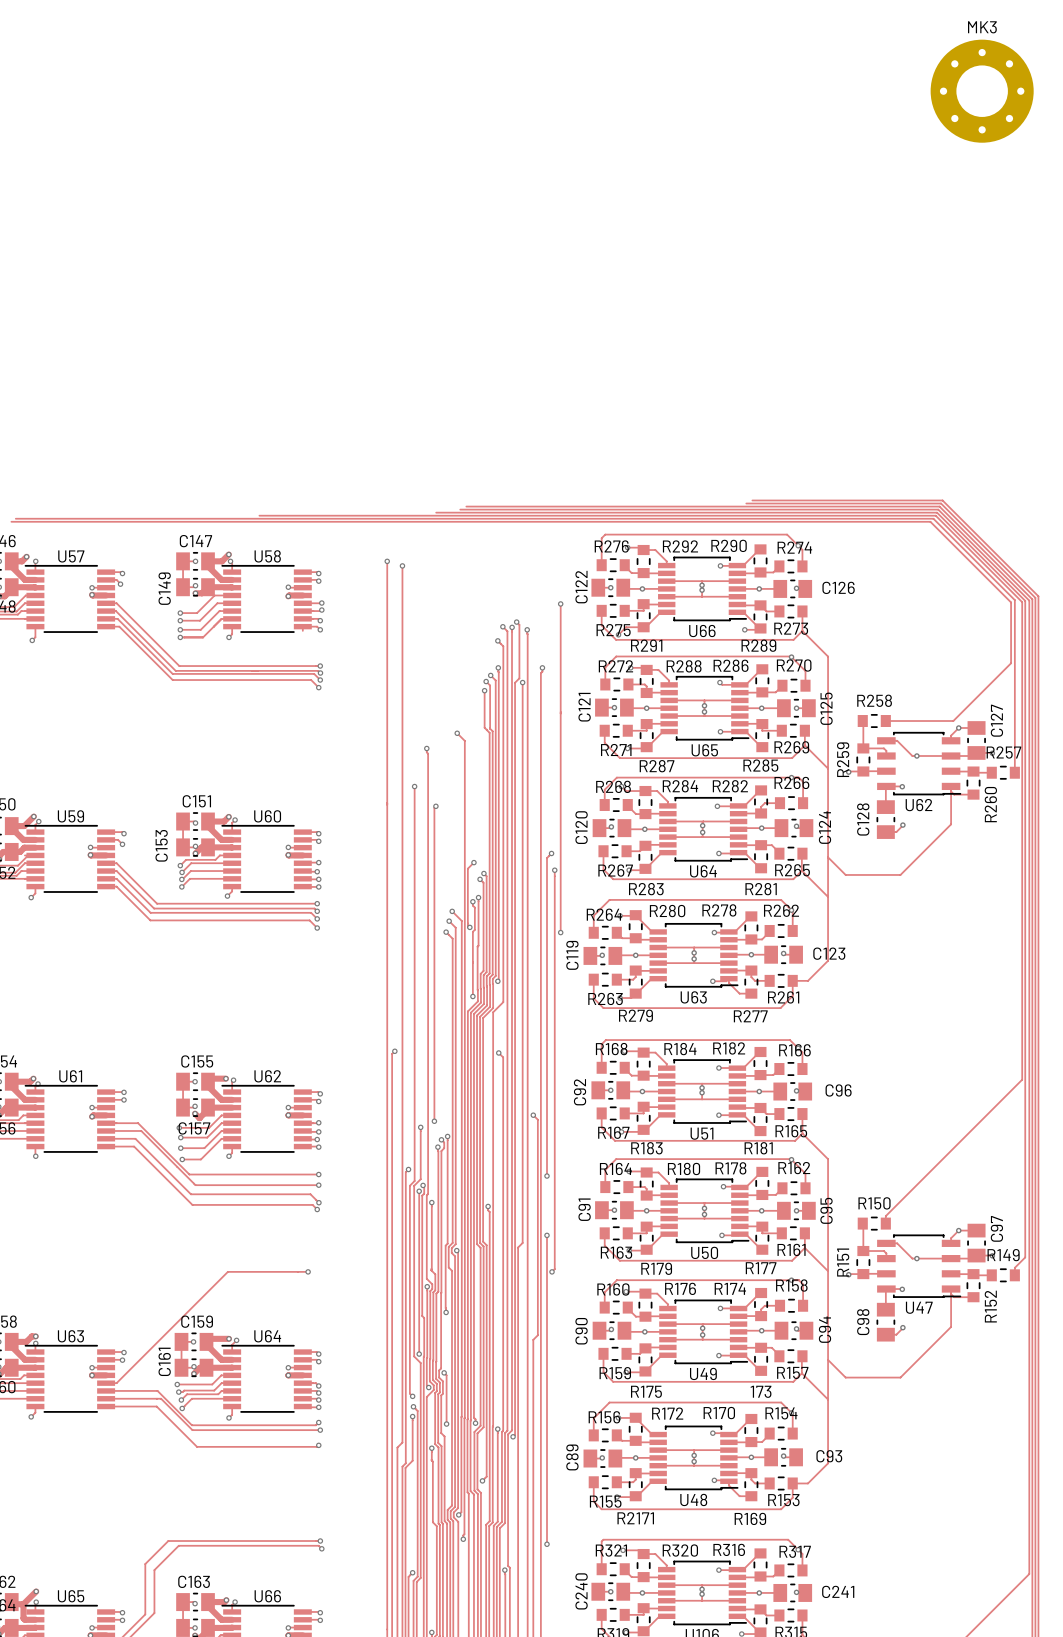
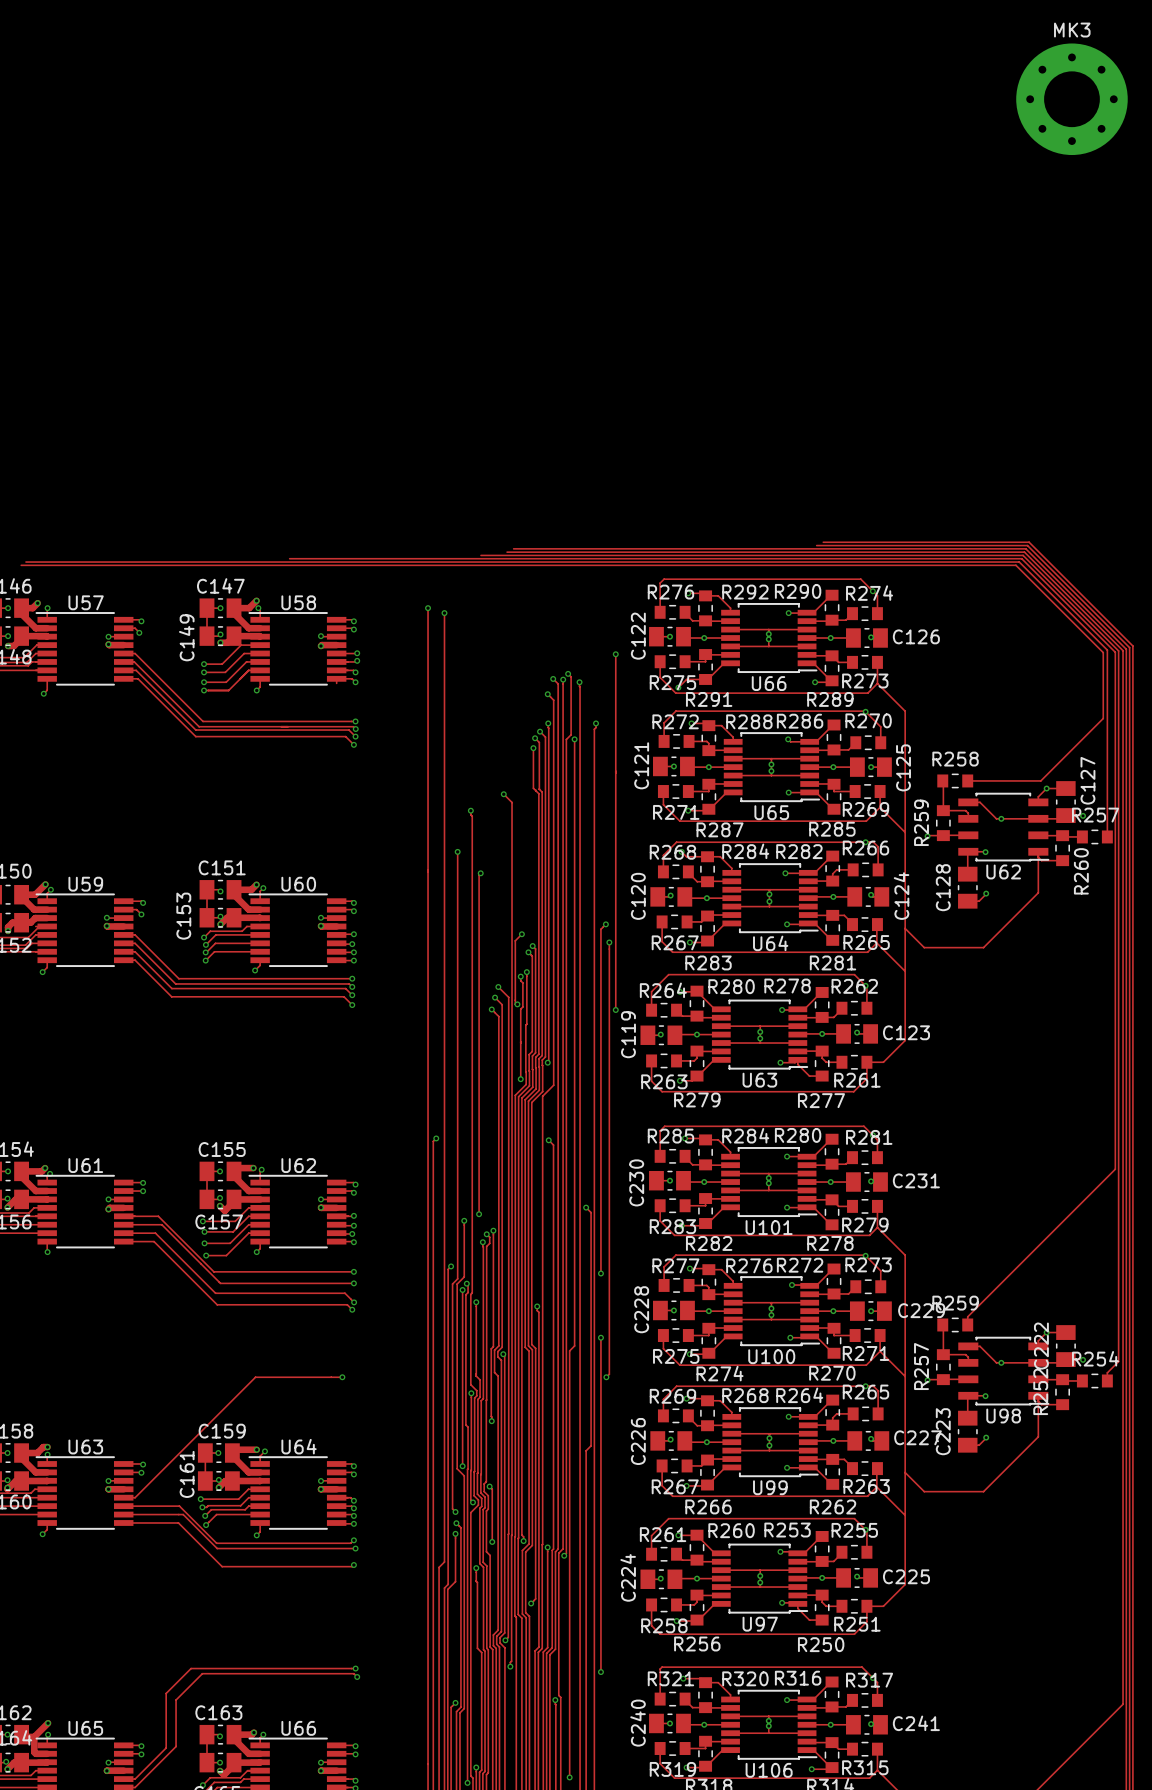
R182 name: R182 (729, 1048) -> R280 (798, 1135)
R168 name: R168 (611, 1049) -> R285 (670, 1136)
R184 name: R184 (680, 1049) -> R284 (745, 1135)
R166 name: R166 (794, 1050) -> R281 (869, 1137)
C96 name: C96 (838, 1090) -> C231 (916, 1180)
C92 name: C92 (580, 1092) -> C230 (636, 1182)
R165 name: R165 (791, 1131) -> R279 (865, 1225)
R167 name: R167 (613, 1132) -> R283 (672, 1226)
U51 name: U51 (702, 1133) -> U101 (769, 1227)
R183 name: R183 (646, 1148) -> R282 (709, 1243)
R181 name: R181 (758, 1148) -> R278 (830, 1243)
R164 name: R164 (615, 1168) -> R277 (675, 1265)
R180 name: R180 (684, 1168) -> R276 (749, 1265)
R178 name: R178 (730, 1168) -> R272 (800, 1265)
R162 name: R162 (794, 1168) -> R273 (868, 1264)
R150 name: R150 (874, 1203) -> R259 (955, 1303)
C91 name: C91 (584, 1209) -> C228 (641, 1309)
C95 name: C95 (826, 1210) -> C229 (921, 1310)
C97 name: C97 (996, 1228) -> C222 (1041, 1346)
R161 name: R161 (791, 1249) -> R271 (865, 1353)
R163 name: R163 (616, 1252) -> R275 (676, 1356)
U50 name: U50 (704, 1252) -> U100 (771, 1356)
R149 name: R149 (1003, 1255) -> R254 (1095, 1358)
R151 name: R151 (843, 1262) -> R257 (921, 1366)
R179 name: R179 (656, 1268) -> R274 (720, 1373)
R177 name: R177 (761, 1268) -> R270 (832, 1373)
R158 name: R158 (791, 1285) -> R265 (865, 1392)
R176 name: R176 (680, 1288) -> R268 (745, 1395)
R174 name: R174 (730, 1288) -> R264 (799, 1395)
R160 name: R160 (613, 1289) -> R269 (672, 1396)
R152 name: R152 (990, 1306) -> R252 (1040, 1391)
U47 name: U47 (919, 1307) -> U98 (1003, 1415)
C98 name: C98 (863, 1322) -> C223 (943, 1431)
C94 name: C94 (825, 1329) -> C227 (917, 1437)
C90 name: C90 (581, 1331) -> C226 (638, 1441)
R157 name: R157 (792, 1372) -> R263 (866, 1486)
R159 name: R159 (615, 1373) -> R267 (675, 1486)
U49 name: U49 (703, 1373) -> U99 (770, 1487)
R175 name: R175 (646, 1391) -> R266 (708, 1506)
173 name: 173 (761, 1391) -> R262 (833, 1506)
R172 name: R172 (667, 1413) -> R260 (731, 1530)
R170 name: R170 (719, 1413) -> R253 (787, 1530)
R154 name: R154 (781, 1413) -> R255 (854, 1530)
R156 name: R156 (604, 1417) -> R261 (663, 1534)
C93 name: C93 (829, 1456) -> C225 (906, 1576)
C89 name: C89 (572, 1457) -> C224 (628, 1577)
U48 name: U48 (693, 1499) -> U97 (760, 1624)
R153 name: R153 (783, 1500) -> R251 (857, 1624)
R155 name: R155 (605, 1501) -> R258 (664, 1625)
R2171 name: R2171 (635, 1518) -> R256 (697, 1644)
R169 name: R169 (750, 1518) -> R250 (821, 1644)

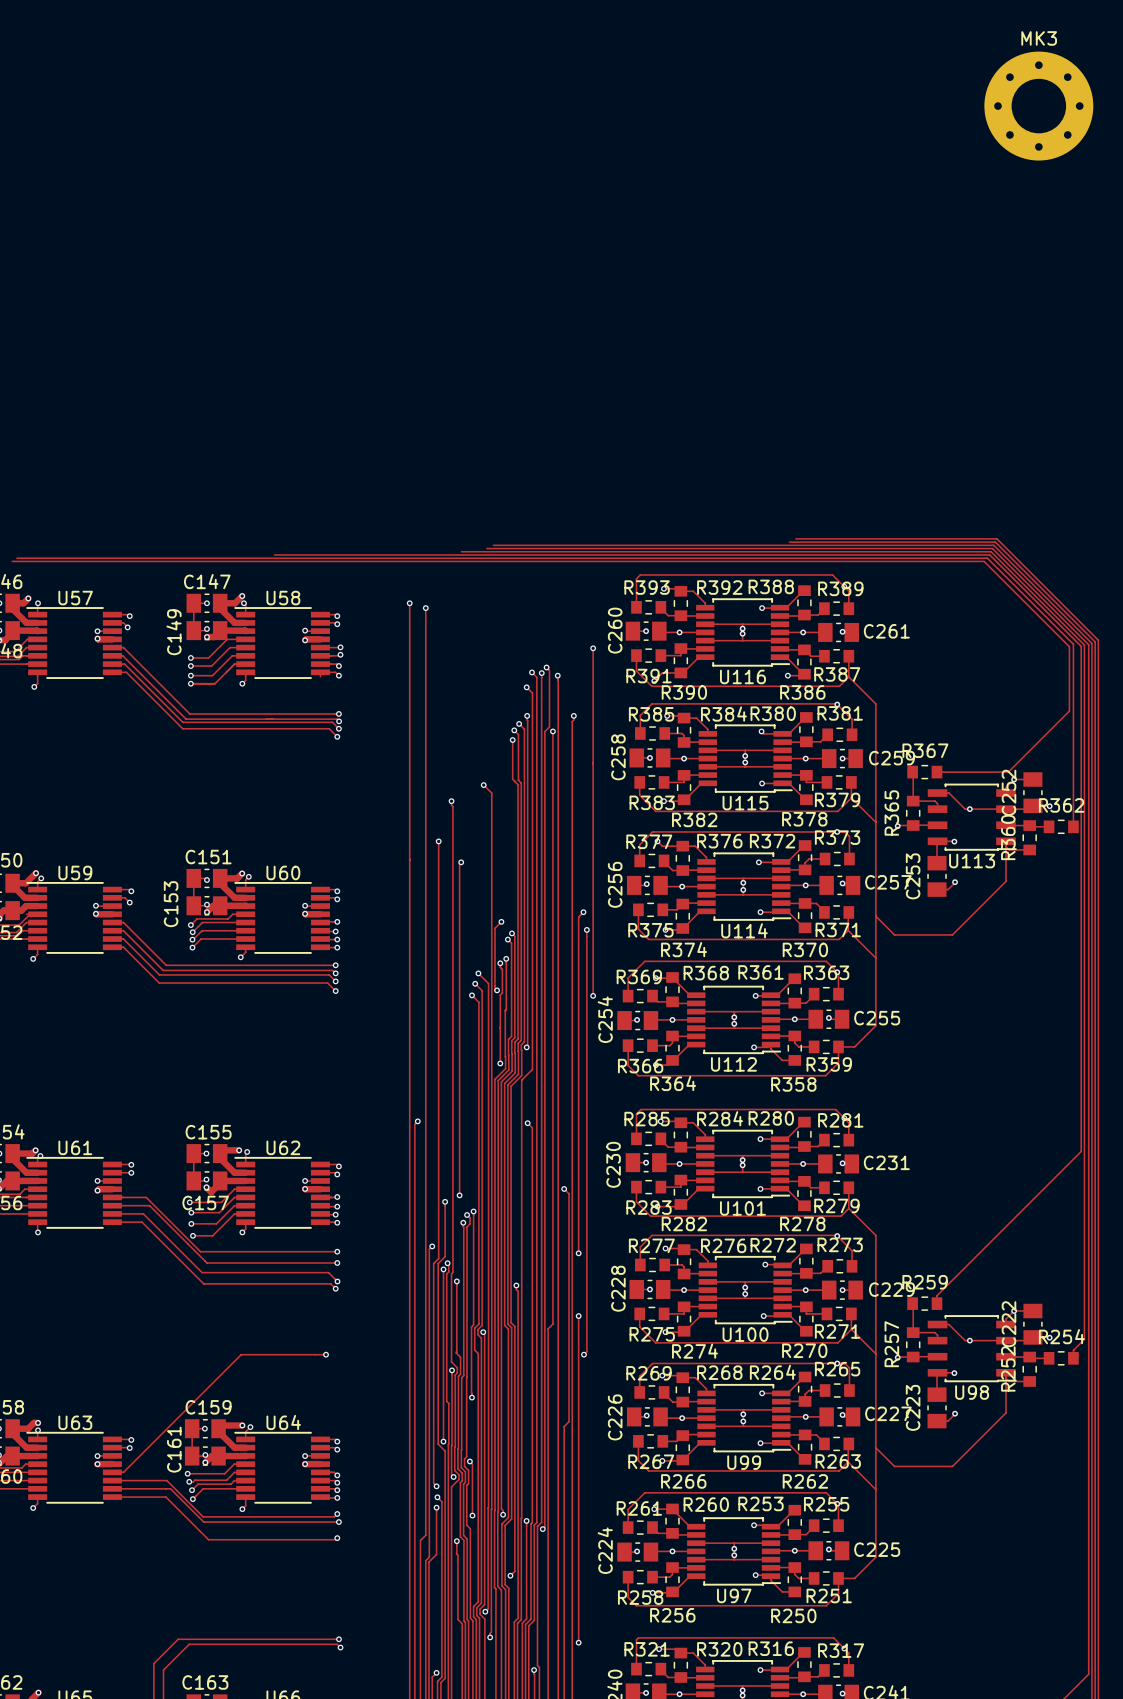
R290 name: R290 (798, 591) -> R388 (771, 586)
R276 name: R276 (670, 592) -> R393 (647, 587)
R292 name: R292 (745, 592) -> R392 (719, 587)
R274 name: R274 (869, 593) -> R389 (840, 588)
C122 name: C122 (638, 636) -> C260 (615, 630)
C126 name: C126 (916, 636) -> C261 (886, 631)
R273 name: R273 (865, 681) -> R387 (837, 674)
R275 name: R275 (672, 682) -> R391 (648, 676)
U66 name: U66 (769, 683) -> U116 (742, 676)
R291 name: R291 (709, 699) -> R390 (684, 692)
R289 name: R289 (830, 699) -> R386 (802, 692)
R270 name: R270 (868, 720) -> R381 (840, 713)
R272 name: R272 (675, 721) -> R385 (651, 714)
R288 name: R288 (749, 721) -> R384 (723, 714)
R286 name: R286 (800, 721) -> R380 (773, 713)
R258 name: R258 (955, 759) -> R367 (925, 750)
C121 name: C121 (641, 765) -> C258 (618, 757)
C125 name: C125 (903, 767) -> C259 (891, 758)
C127 name: C127 (1087, 780) -> C252 (1009, 792)
R269 name: R269 (865, 809) -> R379 (837, 799)
R271 name: R271 (676, 812) -> R383 (652, 802)
U65 name: U65 (771, 812) -> U115 (745, 803)
R257 name: R257 (1095, 815) -> R362 (1061, 805)
R259 name: R259 (921, 822) -> R365 (891, 813)
R287 name: R287 (720, 829) -> R382 (694, 819)
R285 name: R285 (832, 829) -> R378 (804, 819)
R266 name: R266 (865, 848) -> R373 (837, 837)
R284 name: R284 (745, 851) -> R376 (719, 841)
R282 name: R282 (799, 851) -> R372 (772, 841)
R268 name: R268 (672, 852) -> R377 (649, 841)
U62 name: U62 (1003, 871) -> U113 (972, 861)
R260 name: R260 (1081, 871) -> R360 (1008, 837)
C128 name: C128 (943, 887) -> C253 (913, 876)
C120 name: C120 (638, 896) -> C256 (615, 884)
C124 name: C124 (901, 896) -> C257 (888, 882)
R267 name: R267 (675, 942) -> R375 (650, 930)
R265 name: R265 (866, 942) -> R371 (838, 929)
U64 name: U64 (770, 943) -> U114 (744, 930)
R283 name: R283 (708, 962) -> R374 (684, 949)
R281 name: R281 (833, 962) -> R370 (805, 949)
R280 name: R280 (731, 986) -> R368 (706, 973)
R278 name: R278 (787, 986) -> R361 (760, 972)
R262 name: R262 (854, 986) -> R363 (826, 972)
R264 name: R264 (663, 990) -> R369 (639, 976)
C123 name: C123 (906, 1032) -> C255 (877, 1018)
C119 name: C119 (628, 1034) -> C254 (605, 1019)
U63 name: U63 (759, 1080) -> U112 (733, 1064)
R261 name: R261 (857, 1080) -> R359 (829, 1064)
R263 name: R263 (664, 1081) -> R366 (640, 1066)
R279 name: R279 (697, 1099) -> R364 (673, 1083)
R277 name: R277 (821, 1100) -> R358 (793, 1084)

